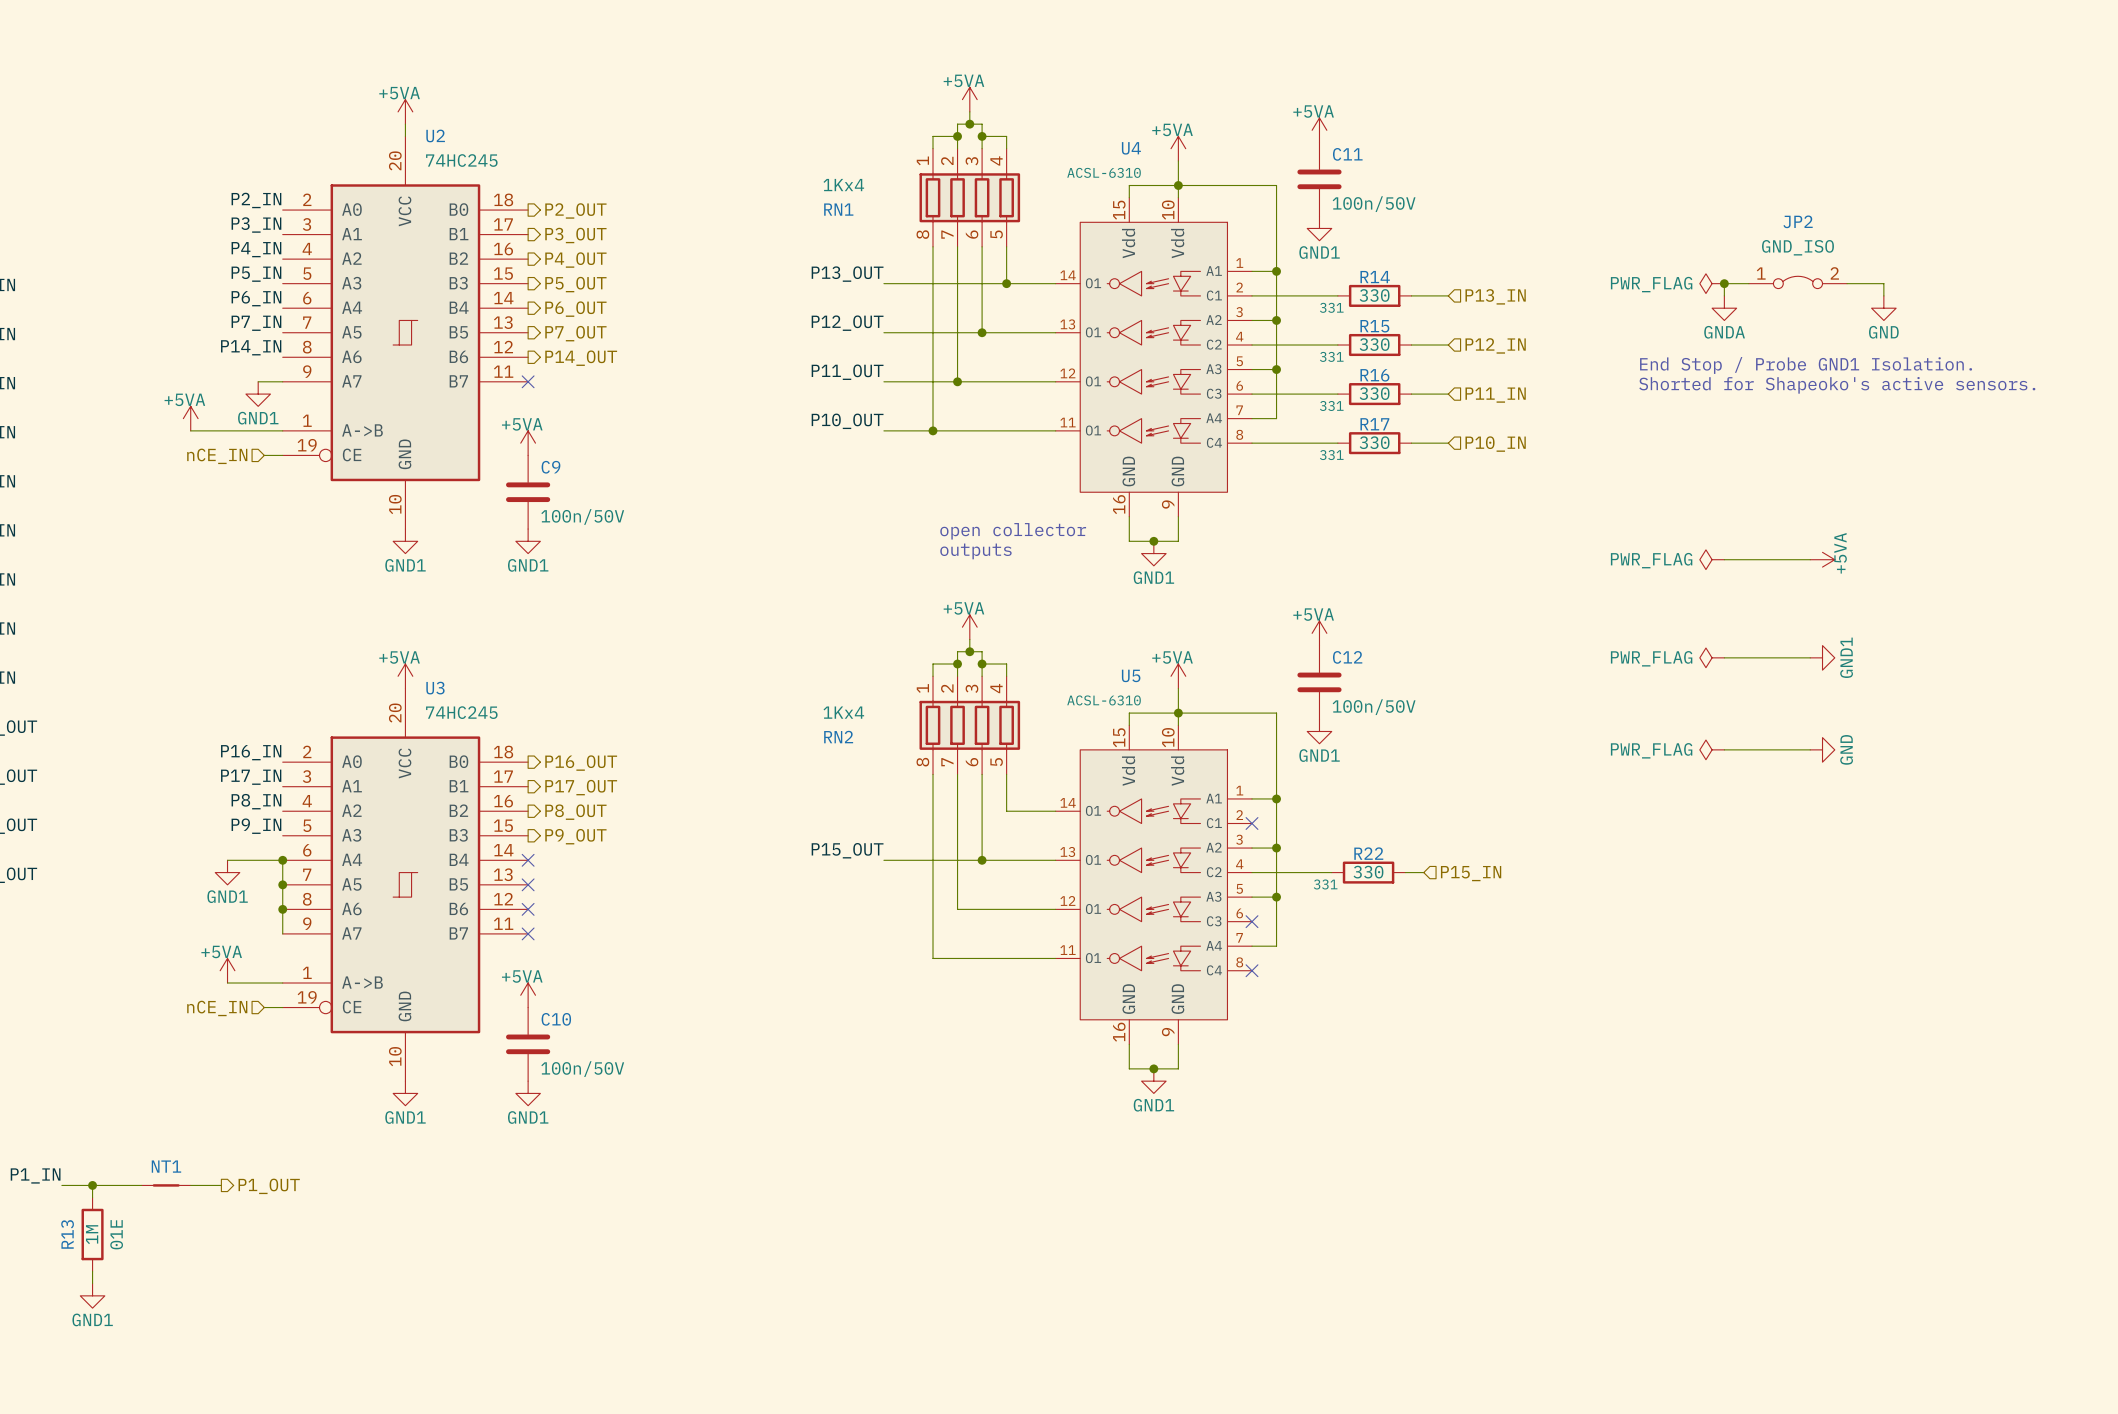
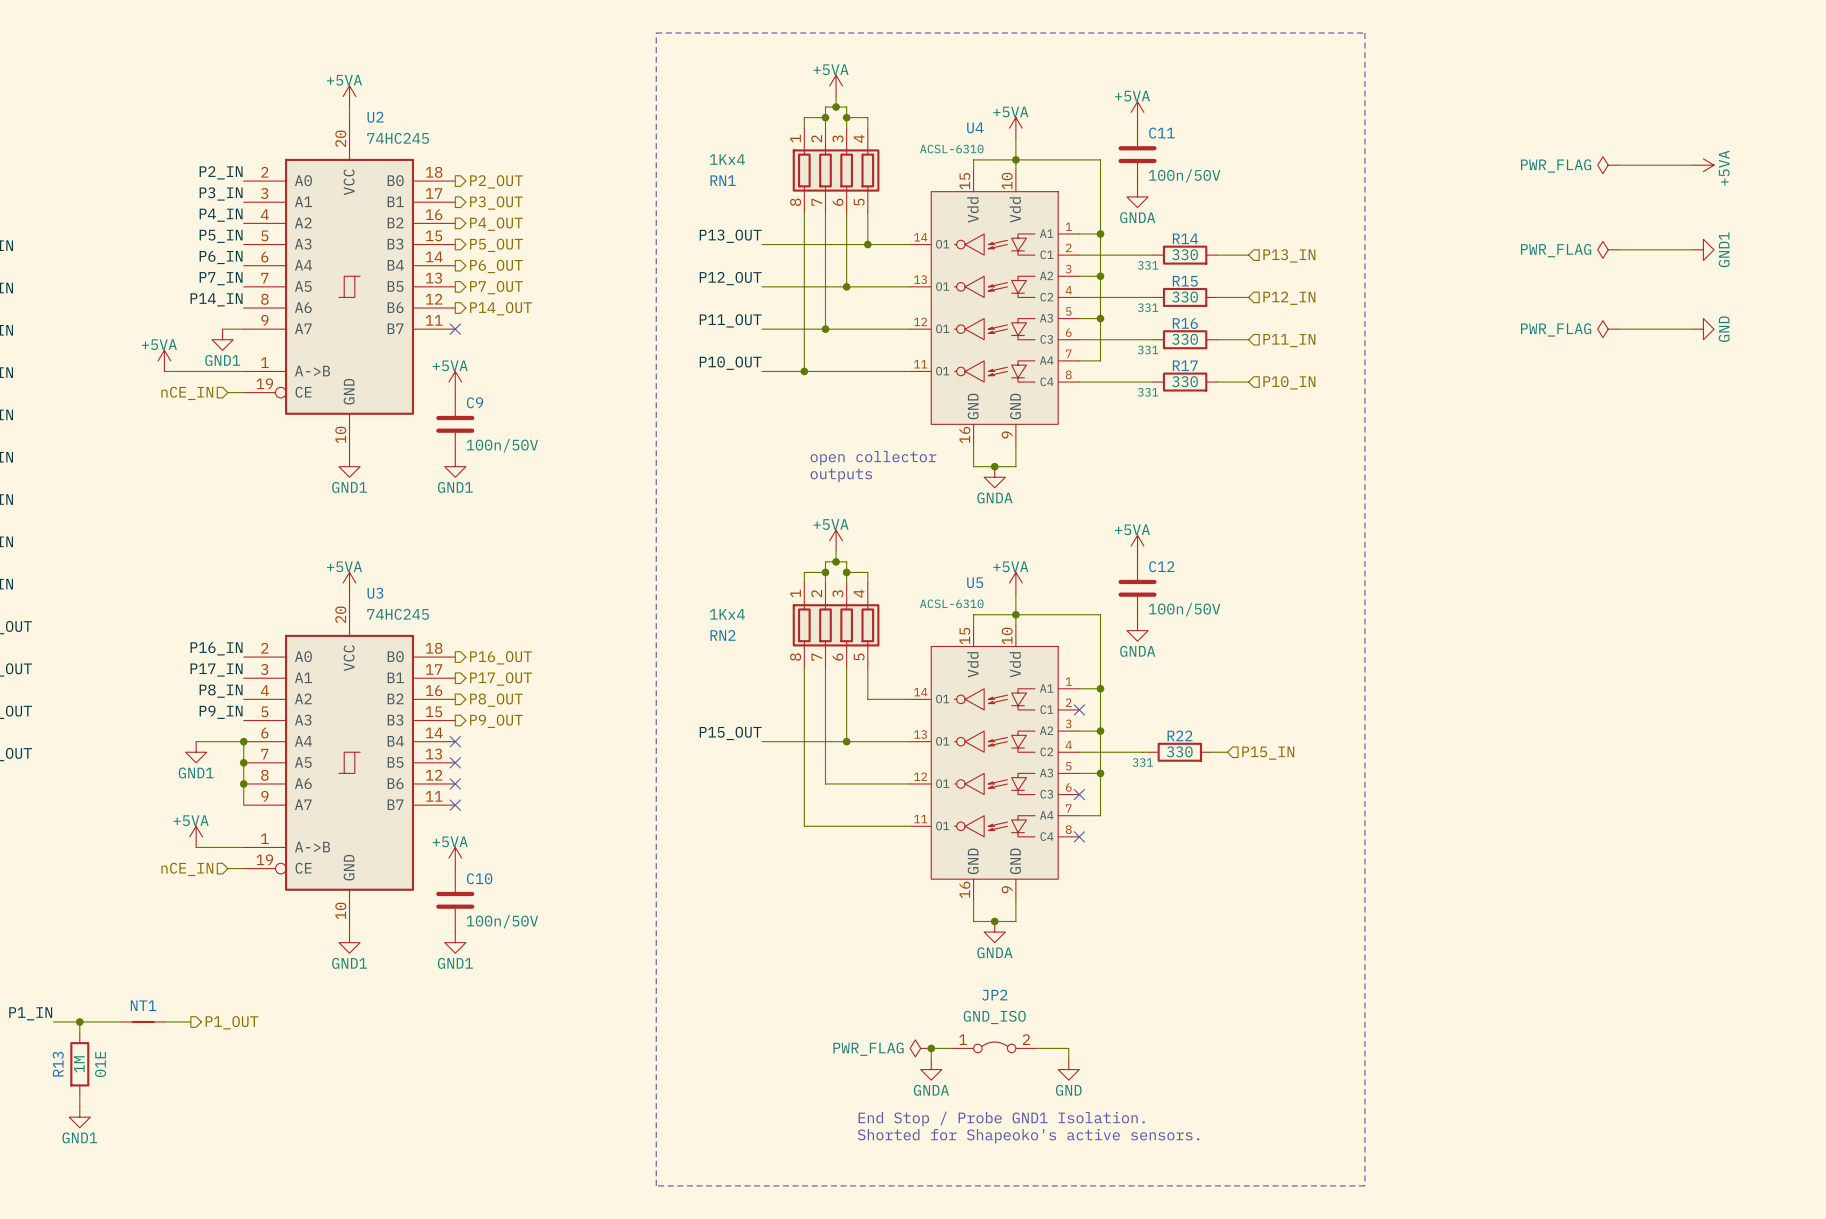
line: none -> (656, 32) (1364, 32) (1364, 1185) (656, 1185) (656, 32)
power symbol: none -> PWR_FLAG (1608, 165)
wire: none -> (1618, 165) (1692, 165)
power symbol: none -> +5VA (1703, 165)
power symbol: GND1 (1319, 228) -> GNDA (1137, 196)
JP2 position: (1797, 282) -> (994, 1047)
power symbol: PWR_FLAG (1712, 283) -> none
junction: (1724, 283) -> none
wire: (1748, 283) (1724, 283) (1724, 295) -> none
wire: (1847, 283) (1883, 283) (1883, 295) -> none
power symbol: none -> PWR_FLAG (1608, 249)
wire: none -> (1618, 249) (1692, 249)
power symbol: none -> GND1 (1703, 249)
power symbol: GNDA (1724, 308) -> none
power symbol rotation: 0° (1883, 308) -> 90° counterclockwise (1703, 329)
power symbol position: GND (1883, 308) -> GND (1703, 329)
text: End Stop / Probe GND1 Isolation. (1806, 365) -> none
power symbol: none -> PWR_FLAG (1608, 329)
text: Shorted for Shapeoko's active sensors. (1837, 385) -> none
power symbol: GND1 (1153, 553) -> GNDA (994, 477)
power symbol: PWR_FLAG (1712, 559) -> none
wire: (1724, 559) (1810, 559) -> (1618, 329) (1692, 329)
power symbol: +5VA (1822, 559) -> none
power symbol: PWR_FLAG (1712, 657) -> none
wire: (1724, 657) (1810, 657) -> none
power symbol: GND1 (1822, 657) -> none
power symbol: GND1 (1319, 731) -> GNDA (1137, 630)
power symbol: PWR_FLAG (1712, 749) -> none
wire: (1724, 749) (1810, 749) -> none
power symbol: GND (1822, 749) -> none
power symbol: GND1 (1153, 1081) -> GNDA (994, 932)
power symbol: none -> PWR_FLAG (920, 1048)
junction: none -> (931, 1048)
wire: none -> (952, 1048) (931, 1048) (931, 1058)
wire: none -> (1037, 1048) (1068, 1048) (1068, 1058)
power symbol: none -> GNDA (931, 1069)
power symbol: none -> GND (1068, 1069)
text: none -> End Stop / Probe GND1 Isolation. (1001, 1118)
text: none -> Shorted for Shapeoko's active sensors. (1028, 1136)

